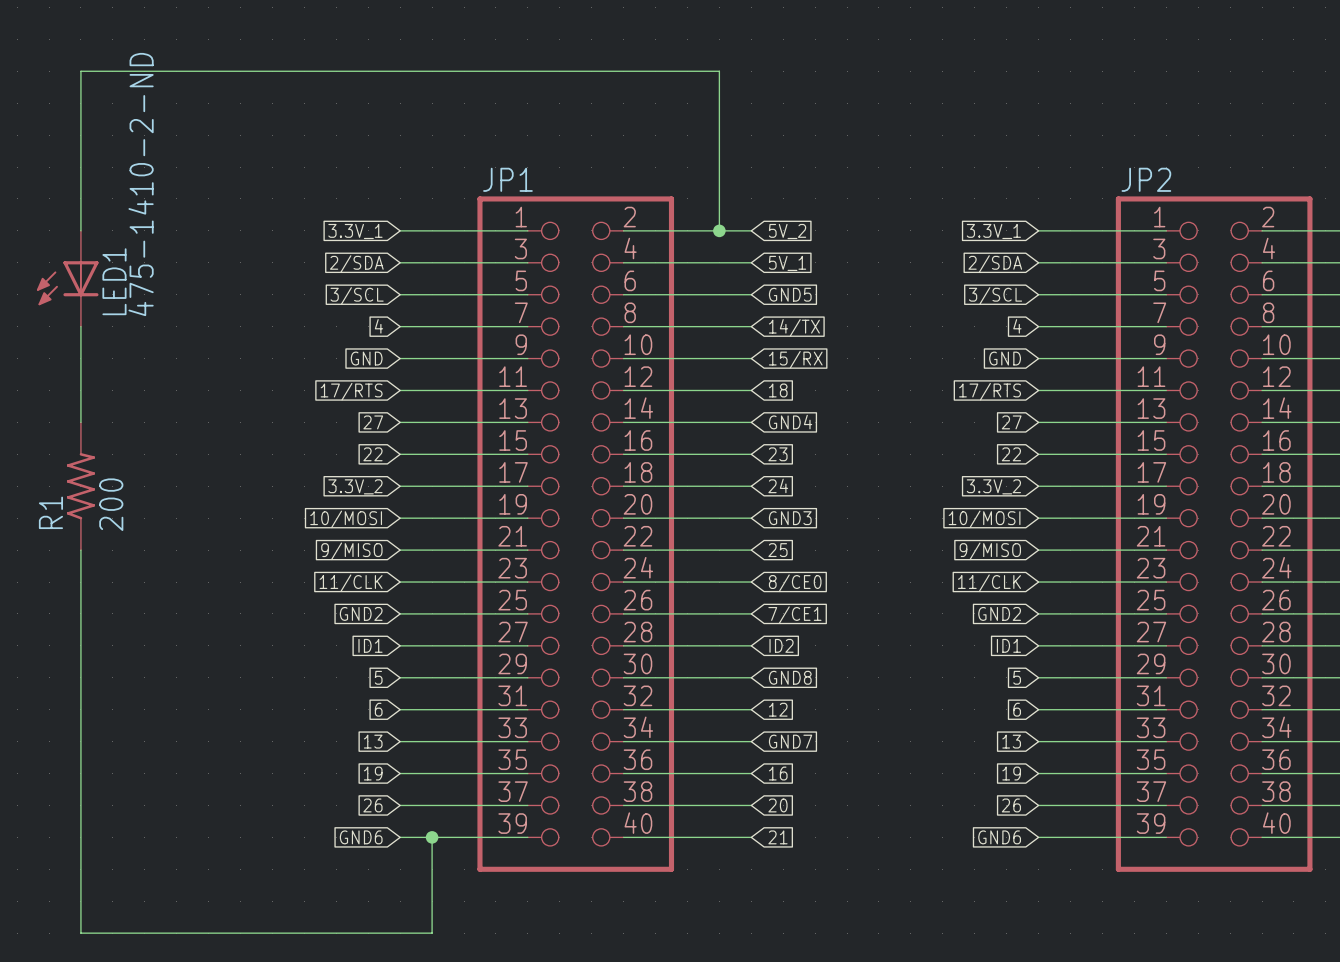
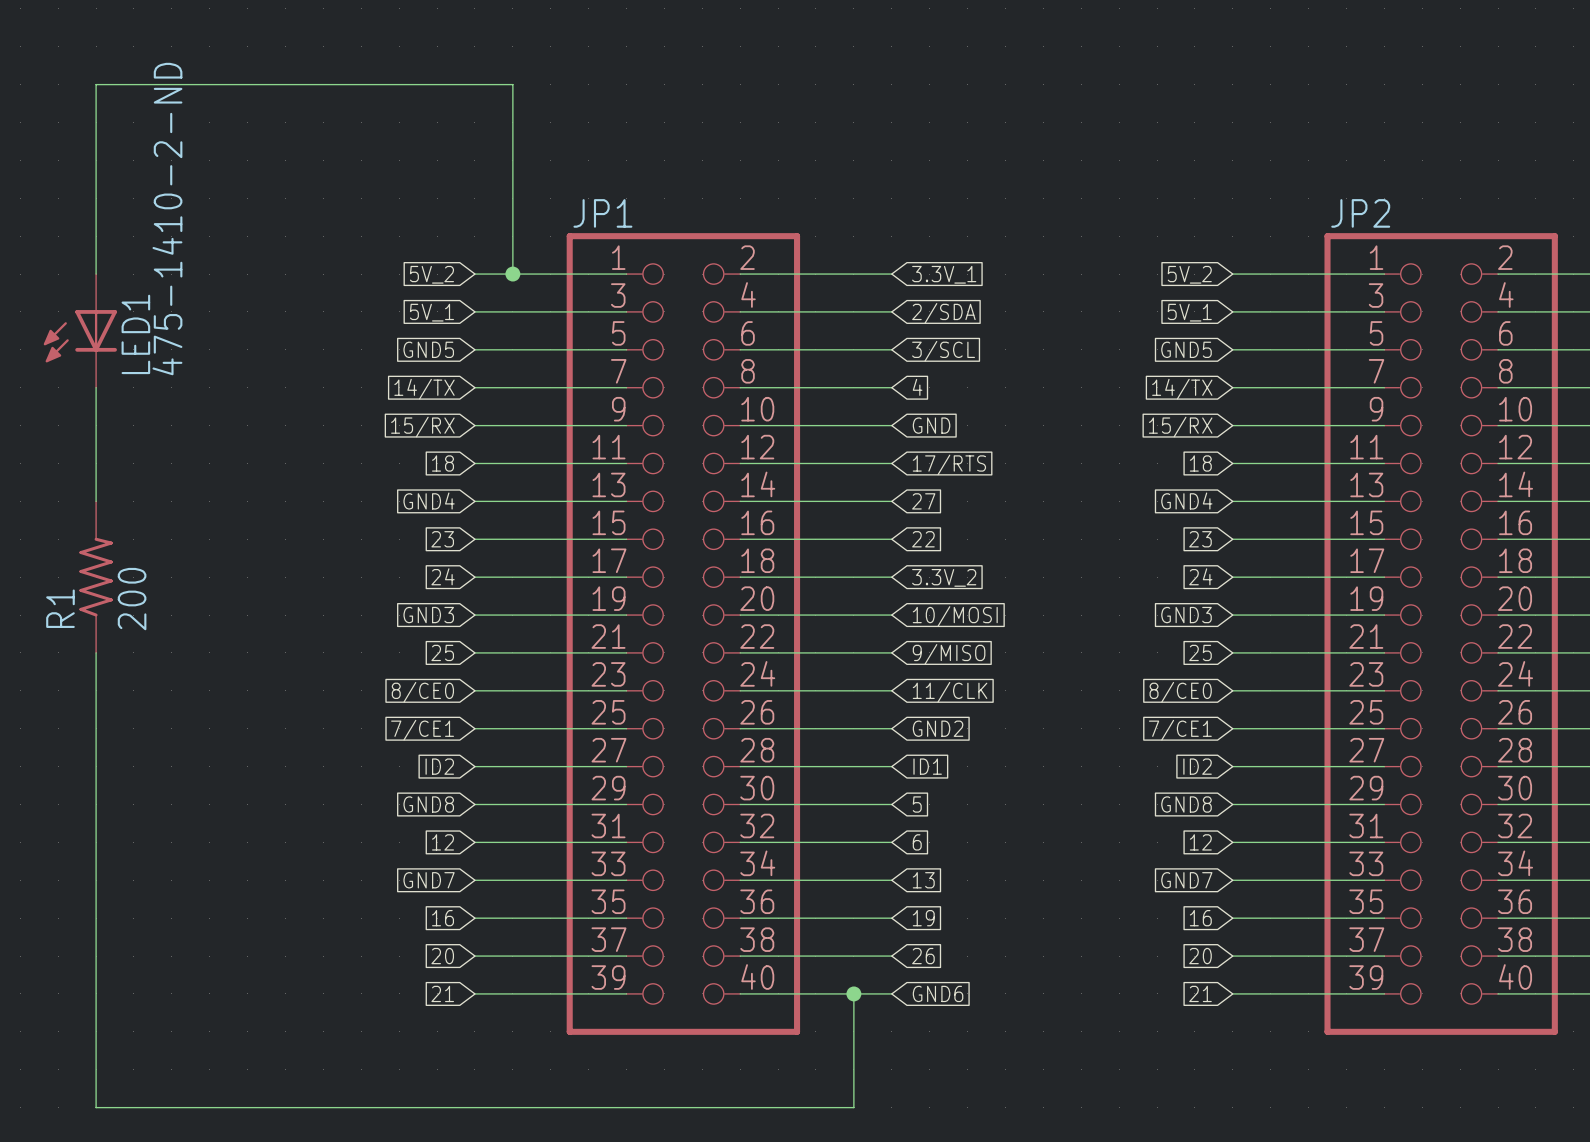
wire: (432, 71) (719, 71) (719, 230) -> (512, 84) (512, 274)
junction: none -> (512, 274)
junction: (719, 230) -> none
global label: 3.3V_1 (355, 231) -> 5V_2 (431, 274)
global label: 5V_2 (787, 231) -> 3.3V_1 (944, 274)
global label: 3.3V_1 (993, 231) -> 5V_2 (1189, 274)
global label: 5V_1 (787, 263) -> 2/SDA (943, 313)
global label: 2/SDA (356, 264) -> 5V_1 (431, 312)
global label: 2/SDA (995, 264) -> 5V_1 (1189, 312)
global label: GND5 (790, 294) -> 3/SCL (943, 351)
global label: 3/SCL (357, 295) -> GND5 (428, 349)
global label: 3/SCL (995, 295) -> GND5 (1186, 349)
global label: 4 (378, 326) -> 14/TX (424, 389)
global label: 4 (1017, 326) -> 14/TX (1182, 389)
global label: 14/TX (794, 327) -> 4 (917, 387)
global label: GND (366, 358) -> 15/RX (422, 427)
global label: GND (1005, 358) -> 15/RX (1180, 427)
global label: 15/RX (795, 359) -> GND (931, 425)
global label: 18 (778, 390) -> 17/RTS (949, 464)
global label: 17/RTS (351, 391) -> 18 (443, 463)
global label: 17/RTS (990, 391) -> 18 (1200, 463)
global label: 27 (373, 422) -> GND4 (429, 501)
global label: GND4 (790, 422) -> 27 (923, 501)
global label: 27 (1011, 422) -> GND4 (1186, 501)
global label: 22 (372, 454) -> 23 (442, 539)
global label: 23 (777, 454) -> 22 (923, 539)
global label: 22 (1011, 454) -> 23 (1200, 539)
global label: 24 (778, 485) -> 3.3V_2 (944, 577)
global label: 3.3V_2 (355, 486) -> 24 (443, 576)
global label: 3.3V_2 (993, 486) -> 24 (1200, 576)
global label: GND3 (790, 518) -> 10/MOSI (955, 616)
global label: 10/MOSI (346, 519) -> GND3 (428, 615)
global label: 10/MOSI (984, 519) -> GND3 (1186, 615)
global label: 25 (777, 550) -> 9/MISO (949, 654)
global label: 9/MISO (351, 551) -> 25 (442, 652)
global label: 9/MISO (990, 551) -> 25 (1200, 652)
global label: 11/CLK (351, 583) -> 8/CE0 (422, 692)
global label: 8/CE0 (795, 583) -> 11/CLK (950, 692)
global label: 11/CLK (989, 583) -> 8/CE0 (1180, 692)
global label: GND2 (361, 613) -> 7/CE1 (422, 730)
global label: GND2 (999, 613) -> 7/CE1 (1180, 730)
global label: 7/CE1 (794, 615) -> GND2 (938, 728)
global label: ID1 (370, 645) -> ID2 (439, 766)
global label: ID2 (781, 645) -> ID1 (927, 766)
global label: ID1 (1008, 645) -> ID2 (1197, 766)
global label: 5 (378, 677) -> GND8 (428, 804)
global label: GND8 (790, 677) -> 5 (917, 804)
global label: 5 (1017, 677) -> GND8 (1186, 804)
global label: 6 (378, 709) -> 12 (443, 842)
global label: 12 (778, 709) -> 6 (917, 842)
global label: 6 (1017, 709) -> 12 (1200, 842)
global label: 13 (373, 741) -> GND7 (429, 880)
global label: GND7 (790, 741) -> 13 (923, 880)
global label: 13 (1011, 741) -> GND7 (1186, 880)
global label: 19 (373, 773) -> 16 (443, 918)
global label: 16 (778, 773) -> 19 (923, 918)
global label: 19 (1011, 773) -> 16 (1200, 918)
global label: 26 (372, 805) -> 20 (442, 956)
global label: 20 (777, 805) -> 26 (923, 956)
global label: 26 (1011, 805) -> 20 (1200, 956)
global label: GND6 (361, 837) -> 21 (442, 993)
wire: (432, 837) (432, 933) -> (853, 993) (853, 1107) (512, 1107)
junction: (432, 837) -> none
junction: none -> (853, 993)
global label: 21 (777, 837) -> GND6 (938, 993)
global label: GND6 (999, 837) -> 21 (1200, 993)

